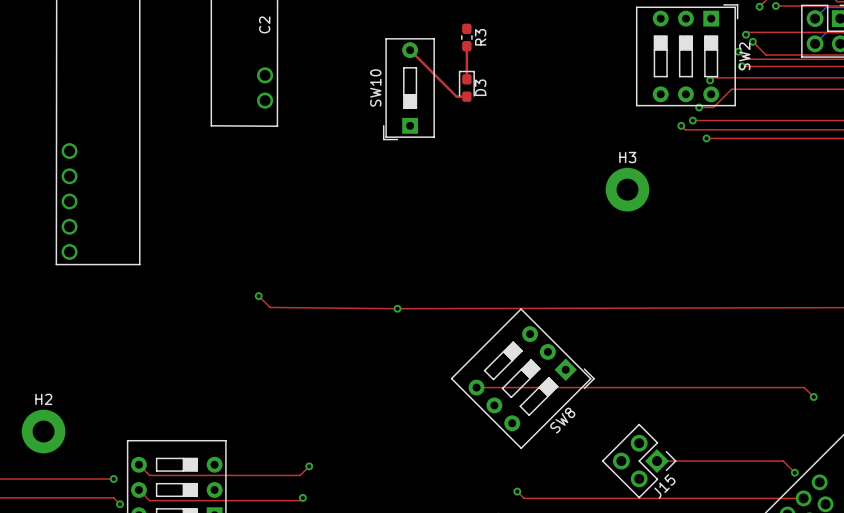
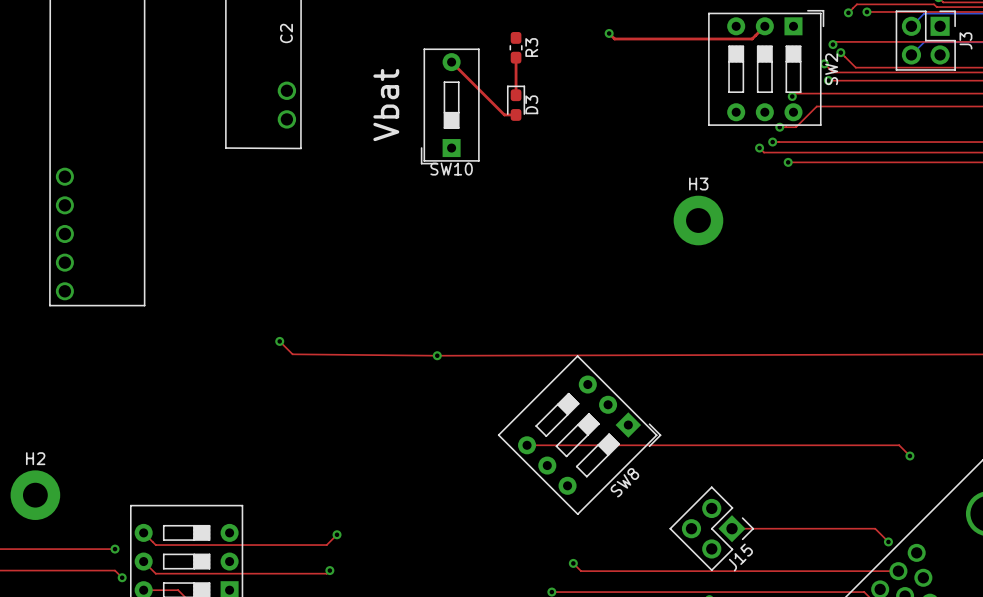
top track: none -> (764, 26) (752, 38) (614, 38) (609, 33)
via: none -> (609, 33)
text: none -> Vbat (386, 105)
SW10 name rotation: 0° (375, 87) -> 90° clockwise (451, 169)
SW10 name position: SW10 (375, 87) -> SW10 (451, 169)

